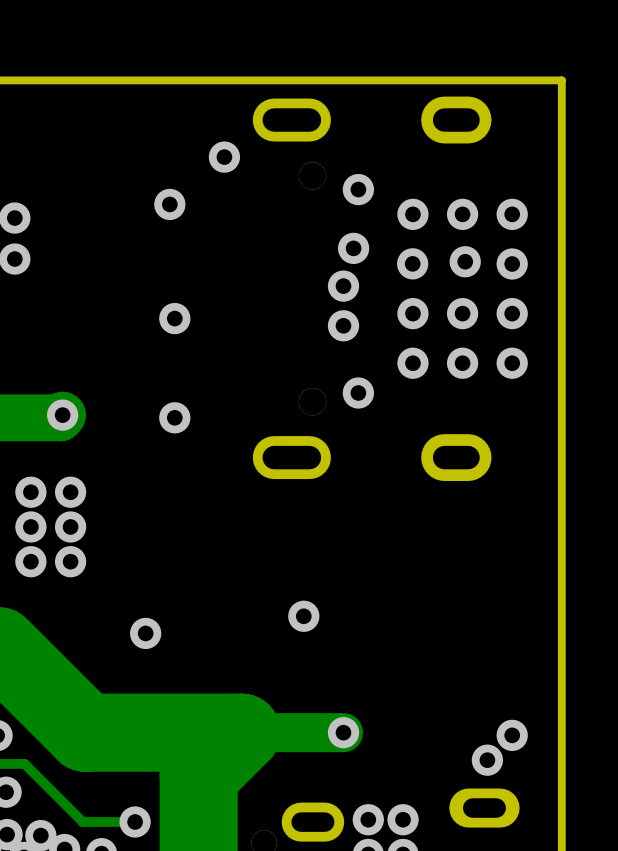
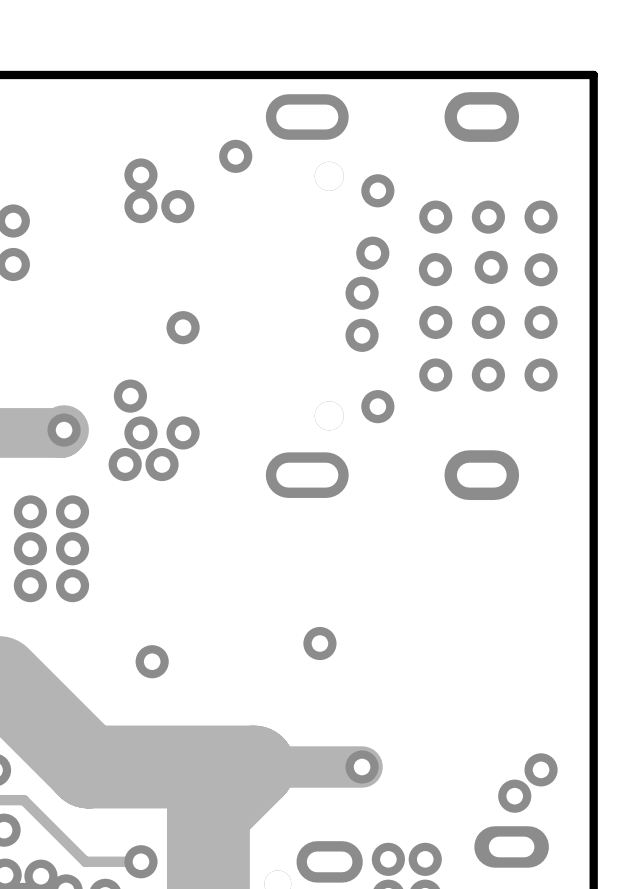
via: none -> (140, 175)
via: none -> (140, 206)
via: none -> (130, 396)
via: none -> (140, 432)
via: none -> (125, 464)
via: none -> (162, 464)

